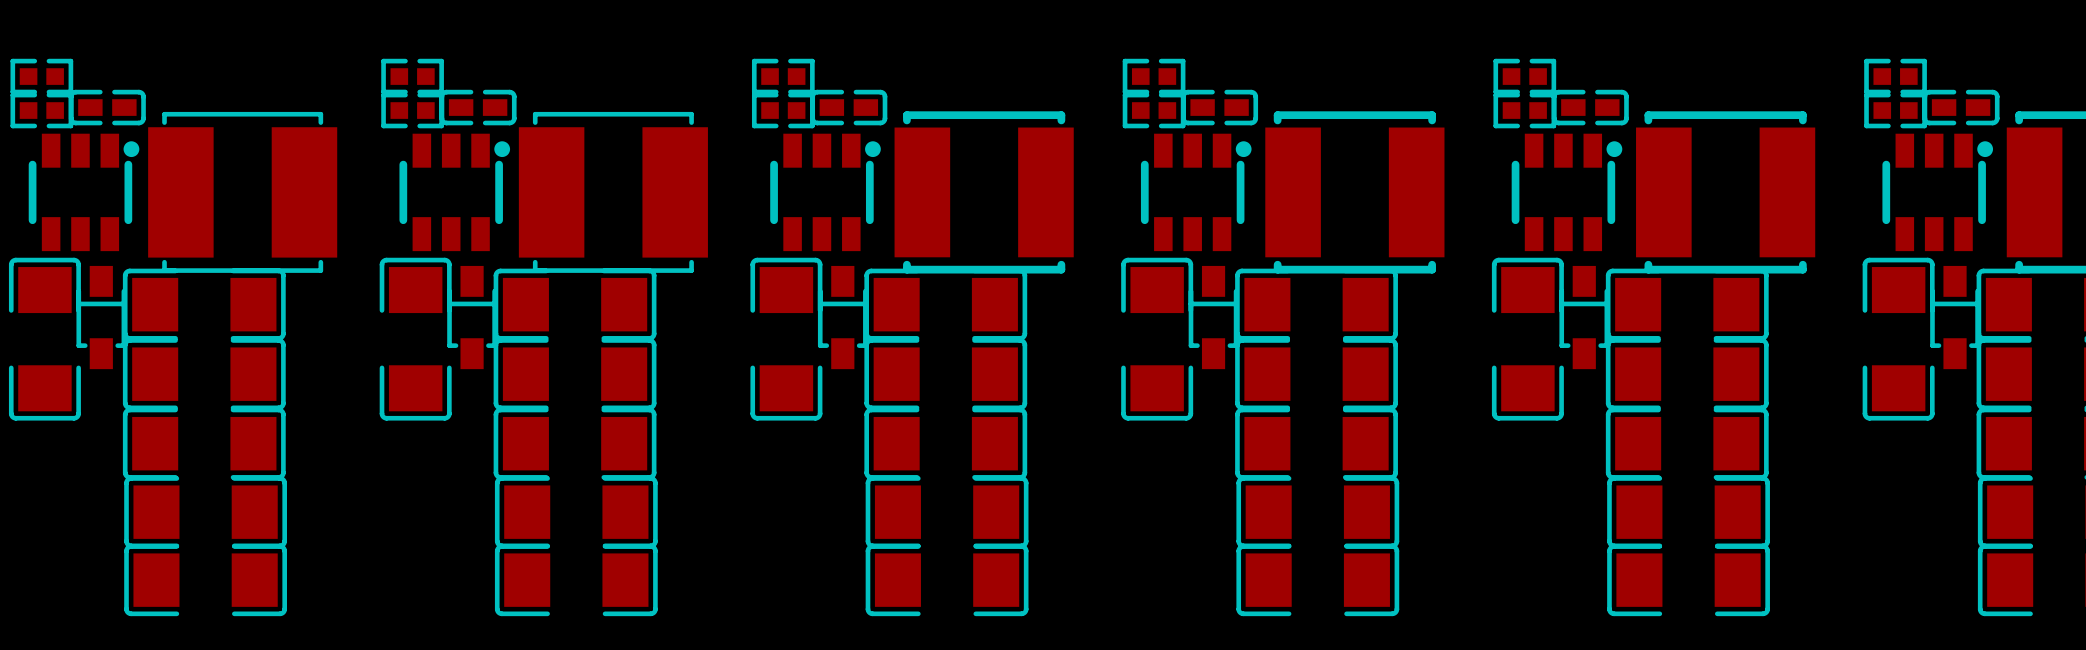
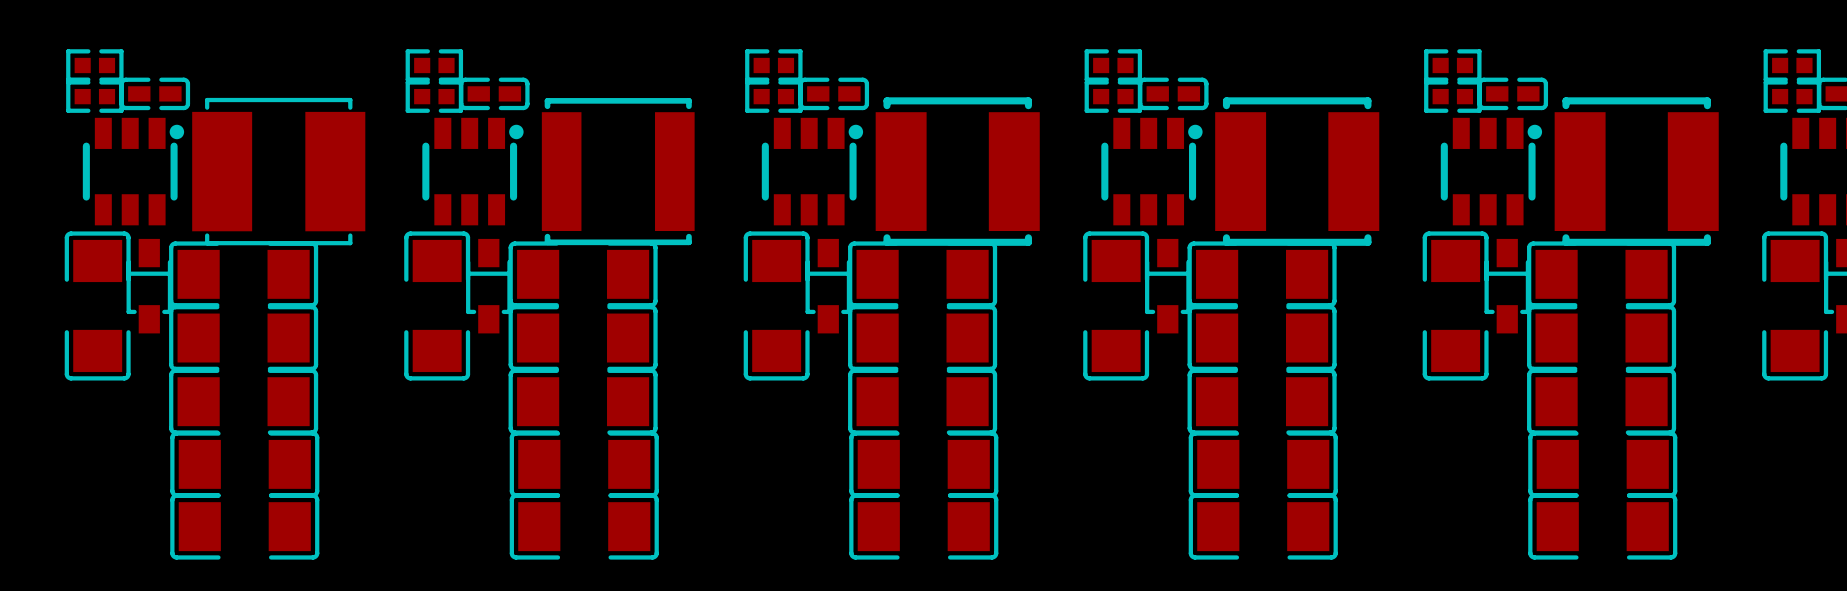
part footprint: [518, 111, 708, 273] -> [541, 98, 695, 246]

